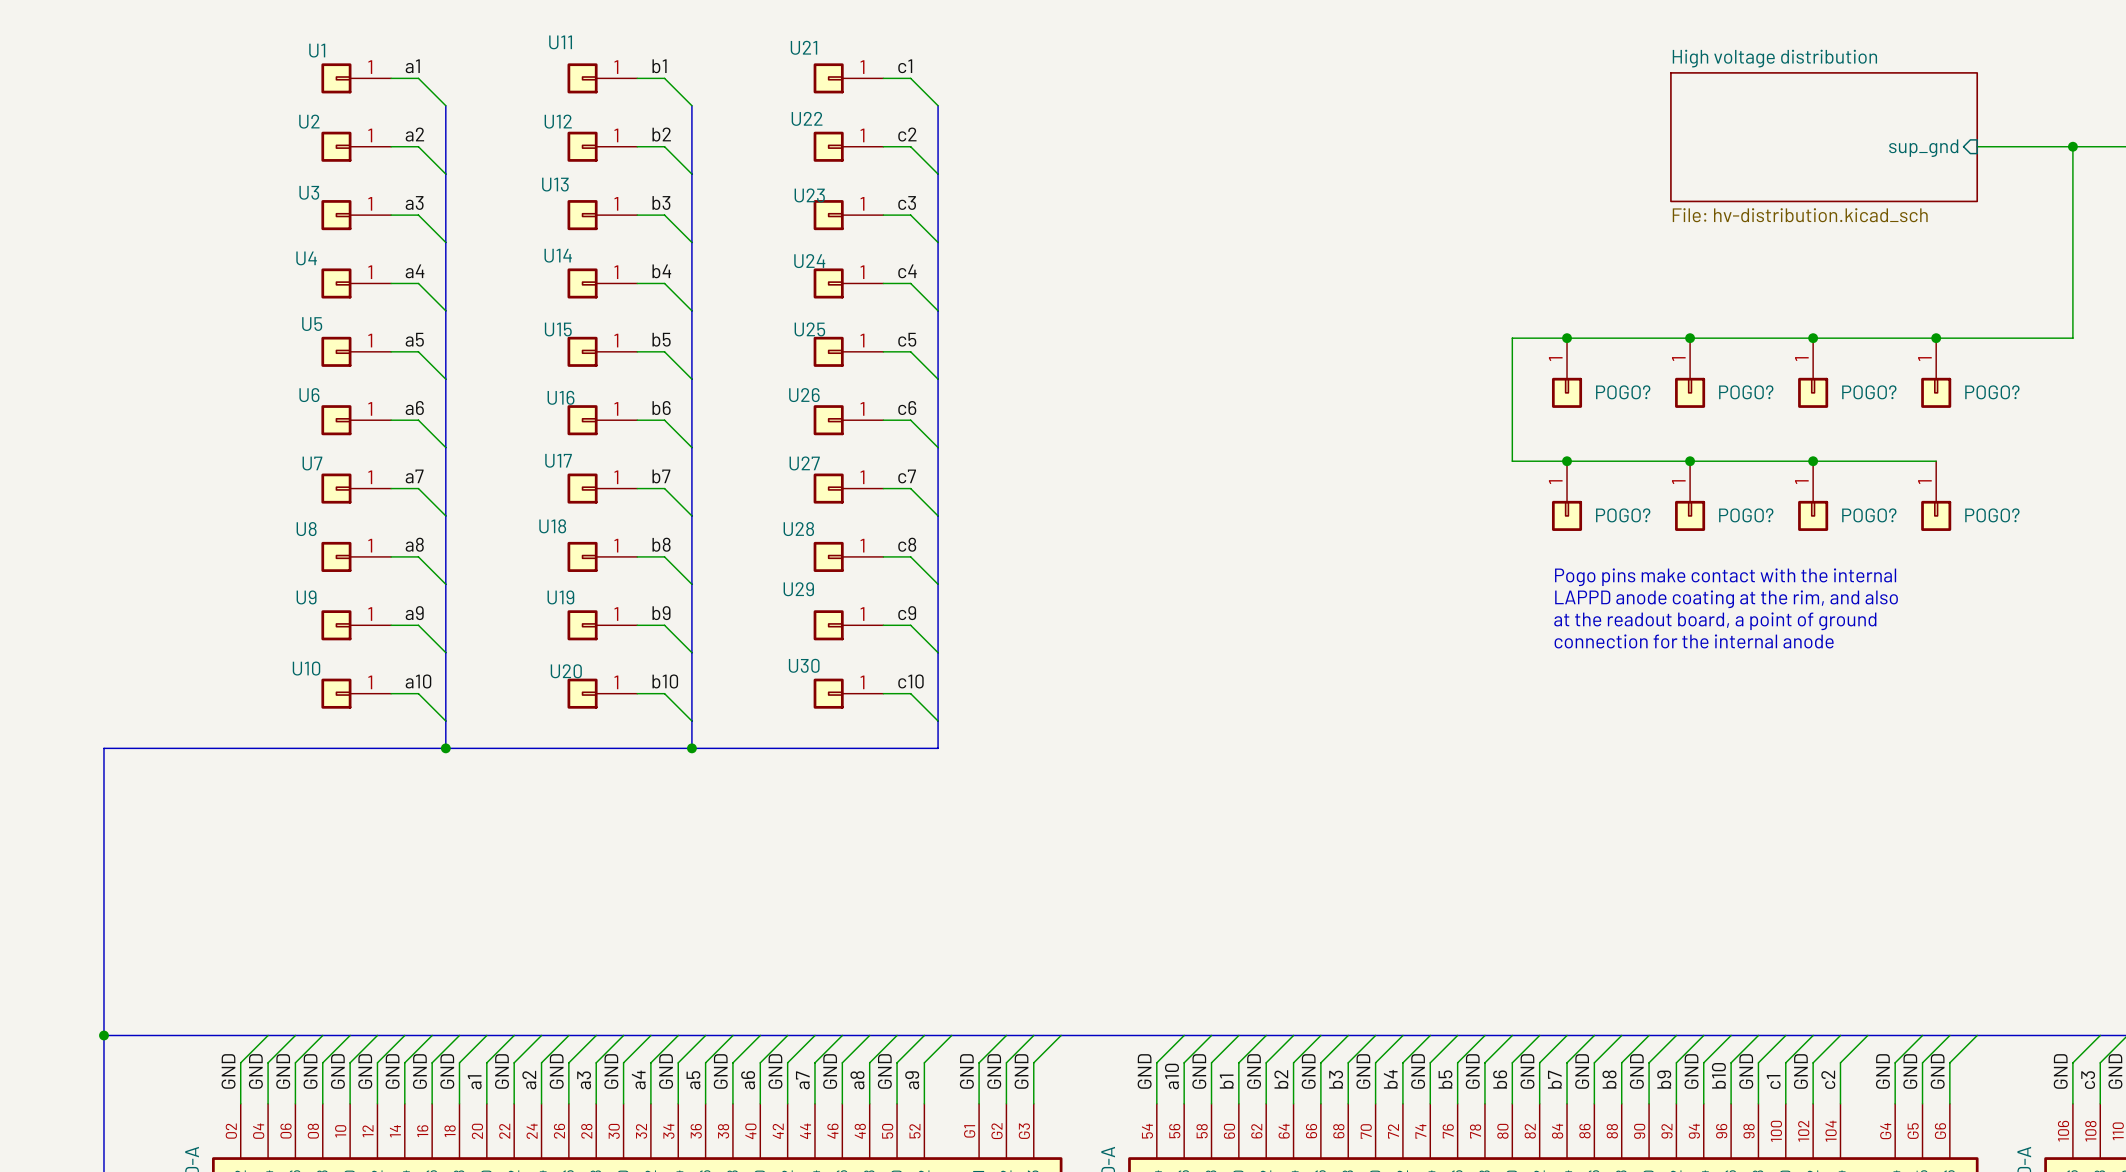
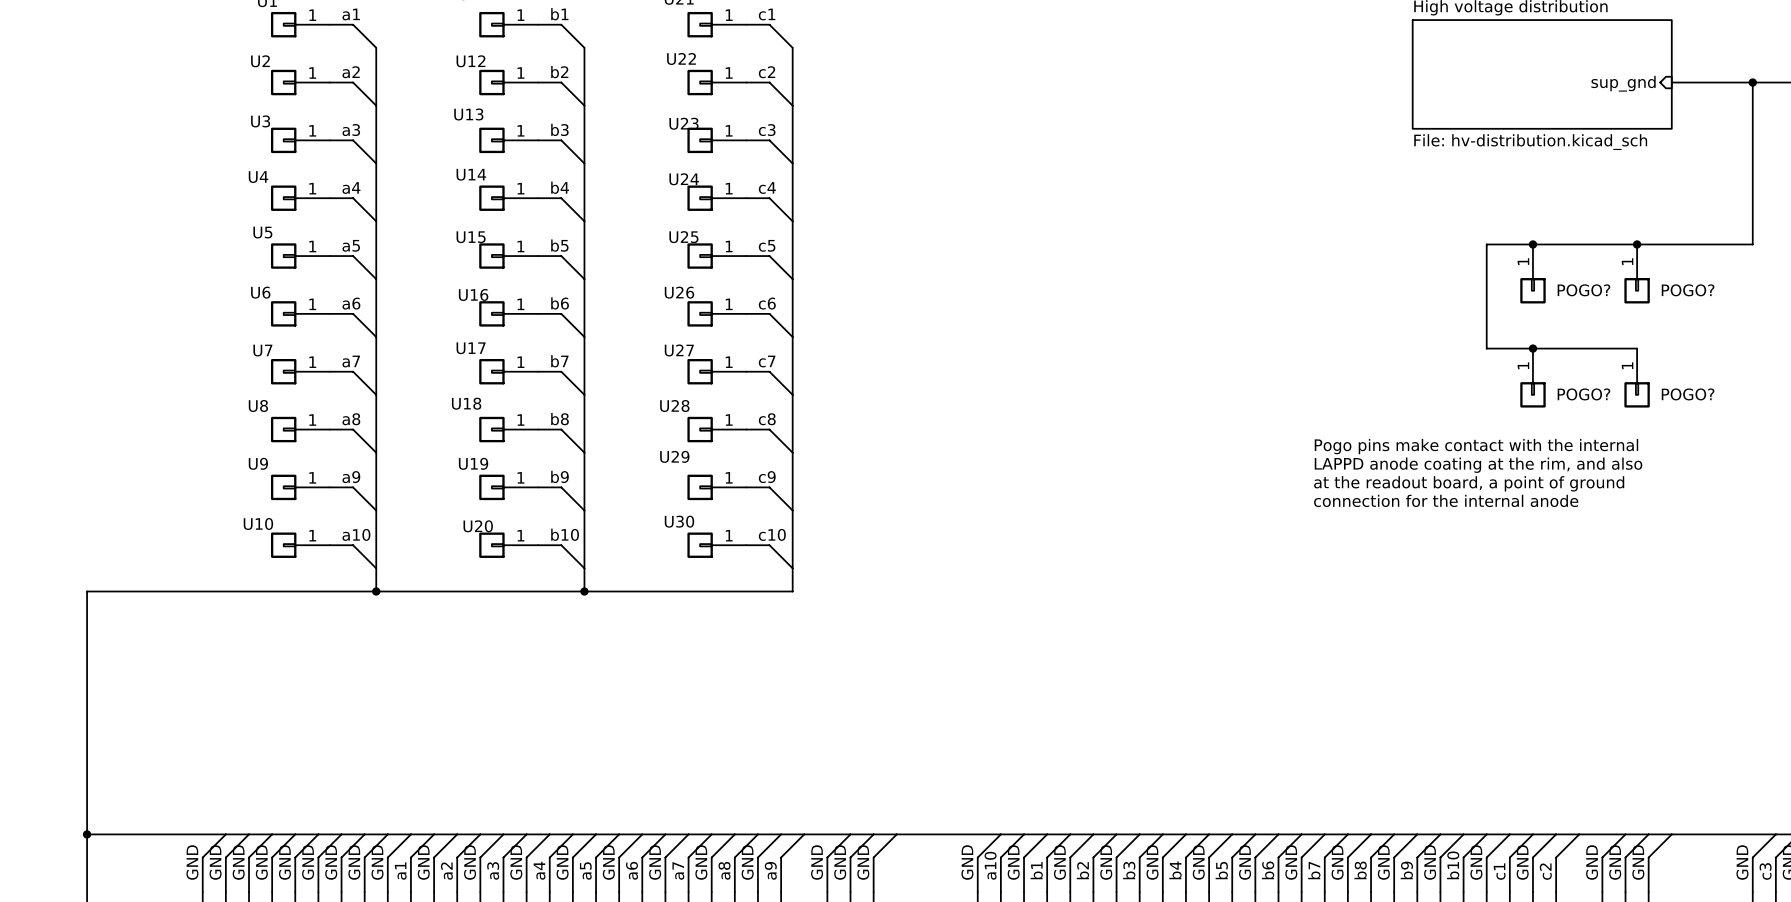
junction: (1567, 338) -> none
junction: (1690, 338) -> none
wire: (1758, 338) (1512, 338) (1512, 461) (1758, 461) -> (1486, 244) (1486, 348)
POGO?: (1567, 373) -> none
POGO?: (1690, 373) -> none
junction: (1567, 461) -> none
junction: (1690, 461) -> none
POGO?: (1567, 496) -> none
POGO?: (1690, 496) -> none

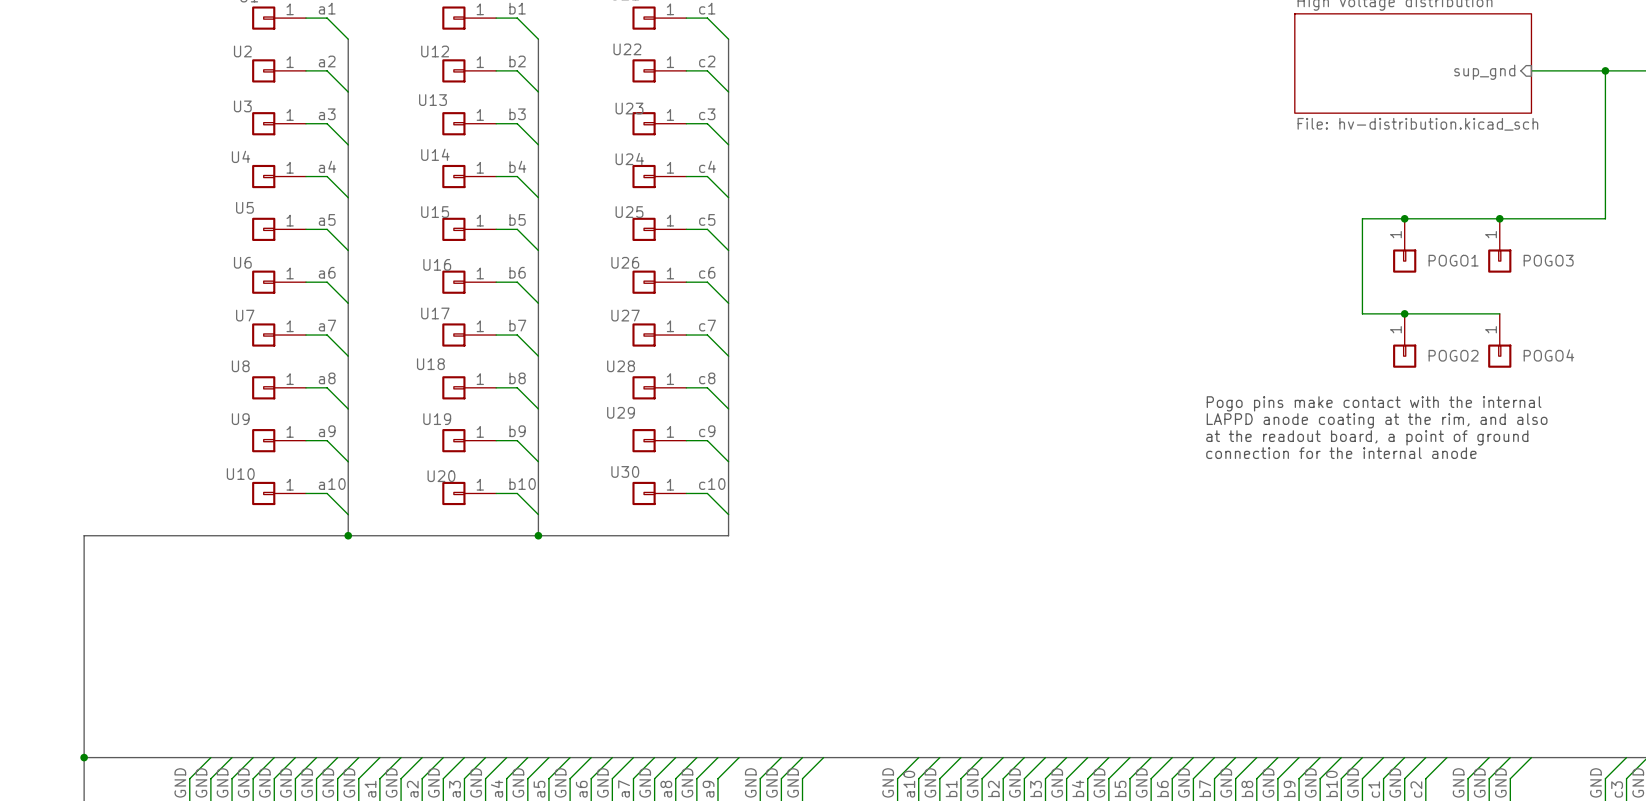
POGO? name: POGO? (1583, 290) -> POGO1 (1453, 260)
POGO? name: POGO? (1688, 290) -> POGO3 (1548, 260)
POGO? name: POGO? (1583, 394) -> POGO2 (1453, 355)
POGO? name: POGO? (1688, 394) -> POGO4 (1548, 355)

